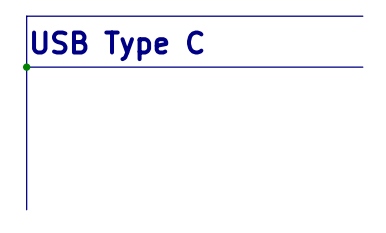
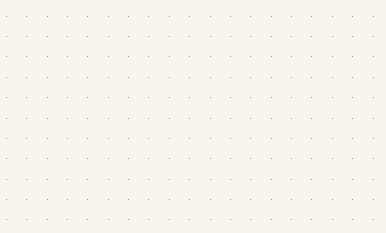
bus: (362, 16) (26, 16) (26, 209) -> none
text: USB Type C (117, 45) -> none
bus: (26, 67) (362, 67) -> none
junction: (26, 67) -> none

